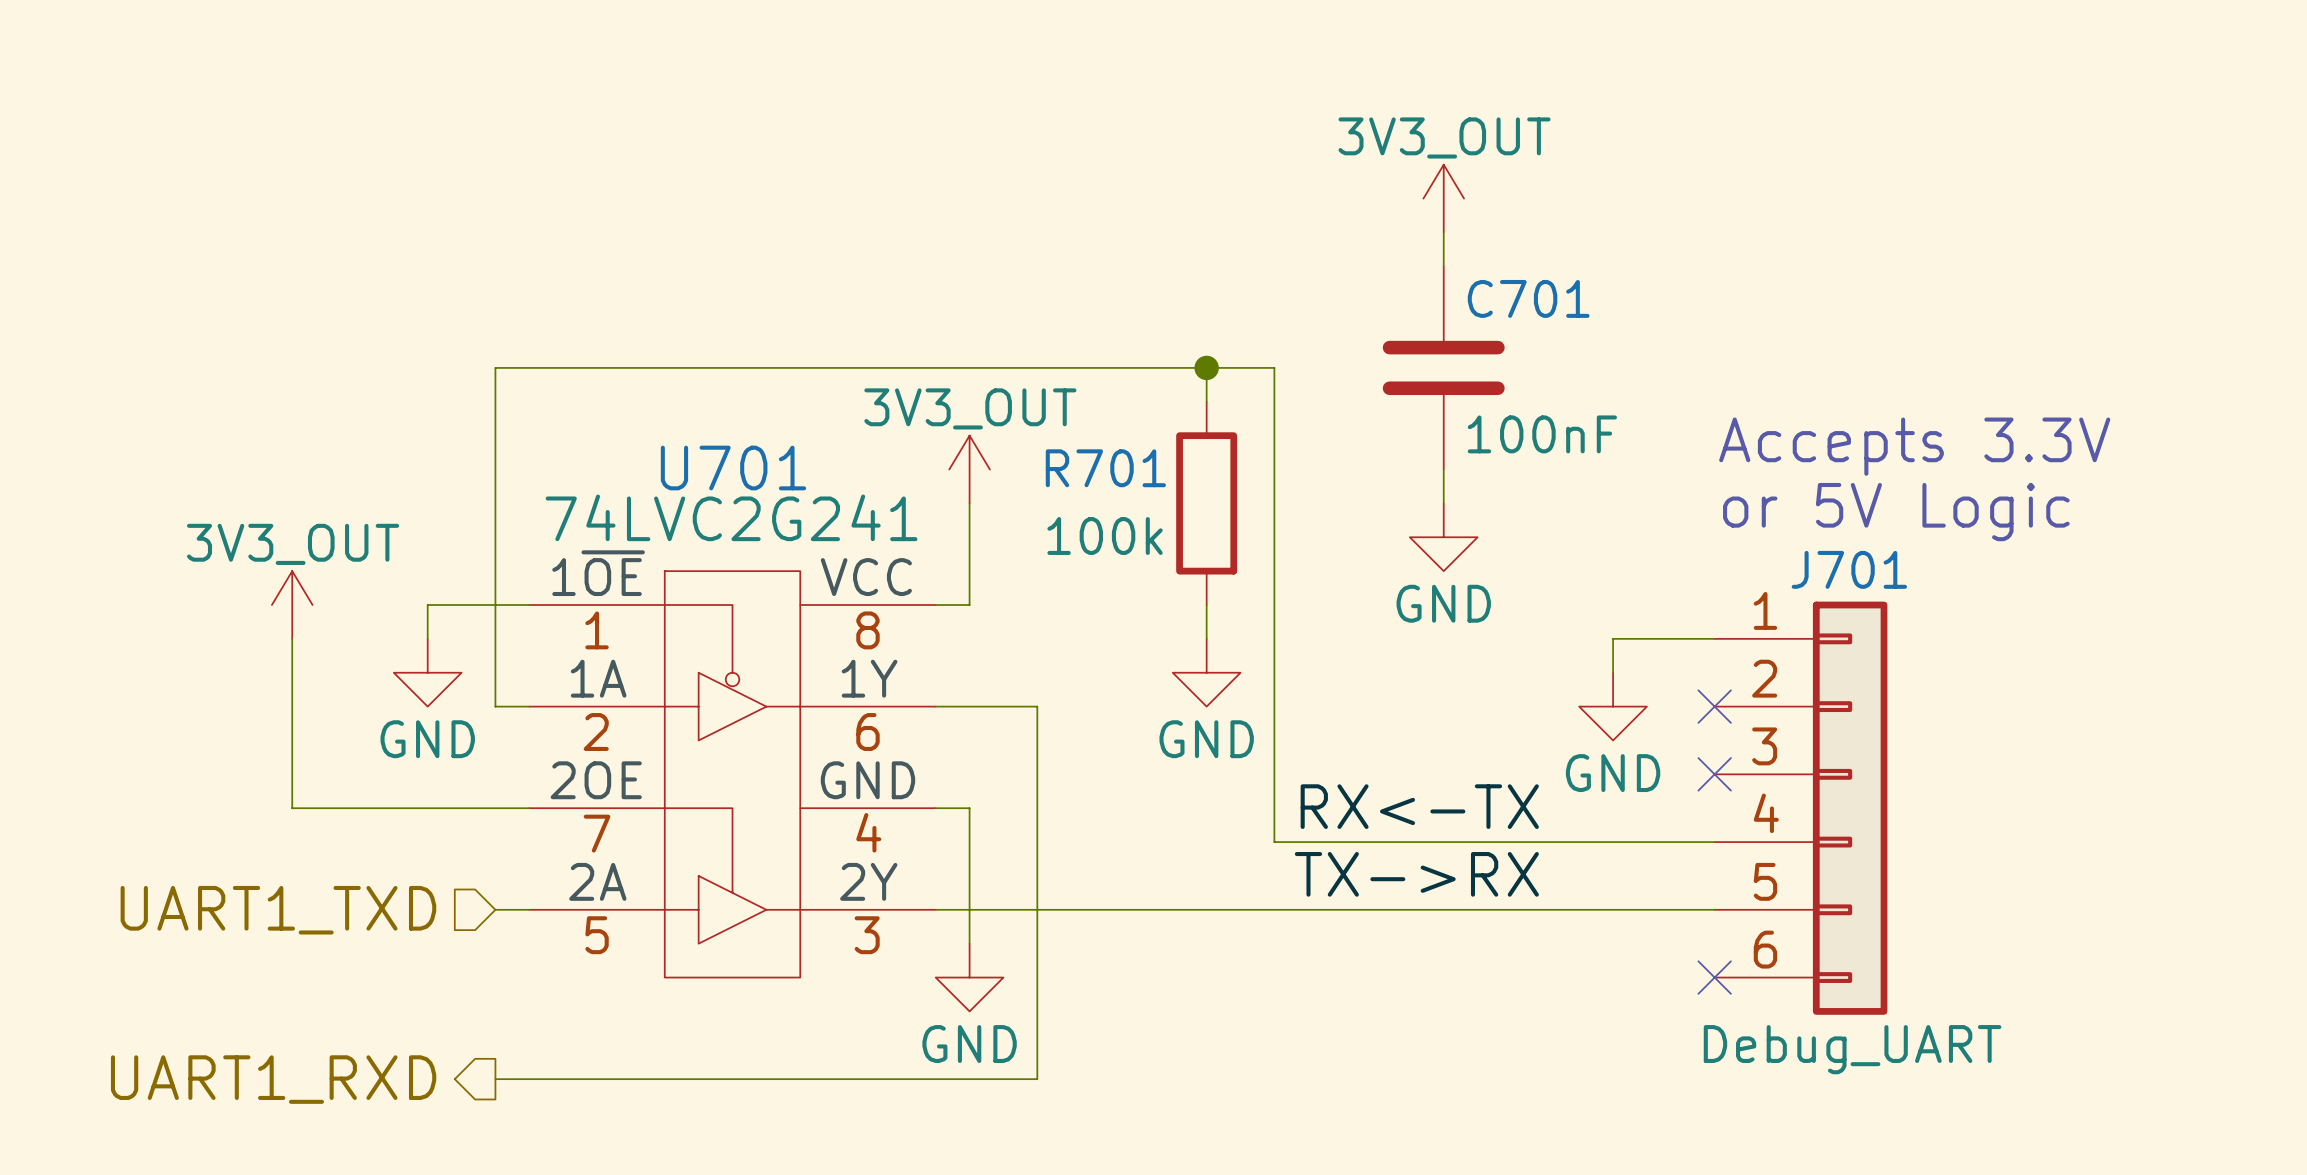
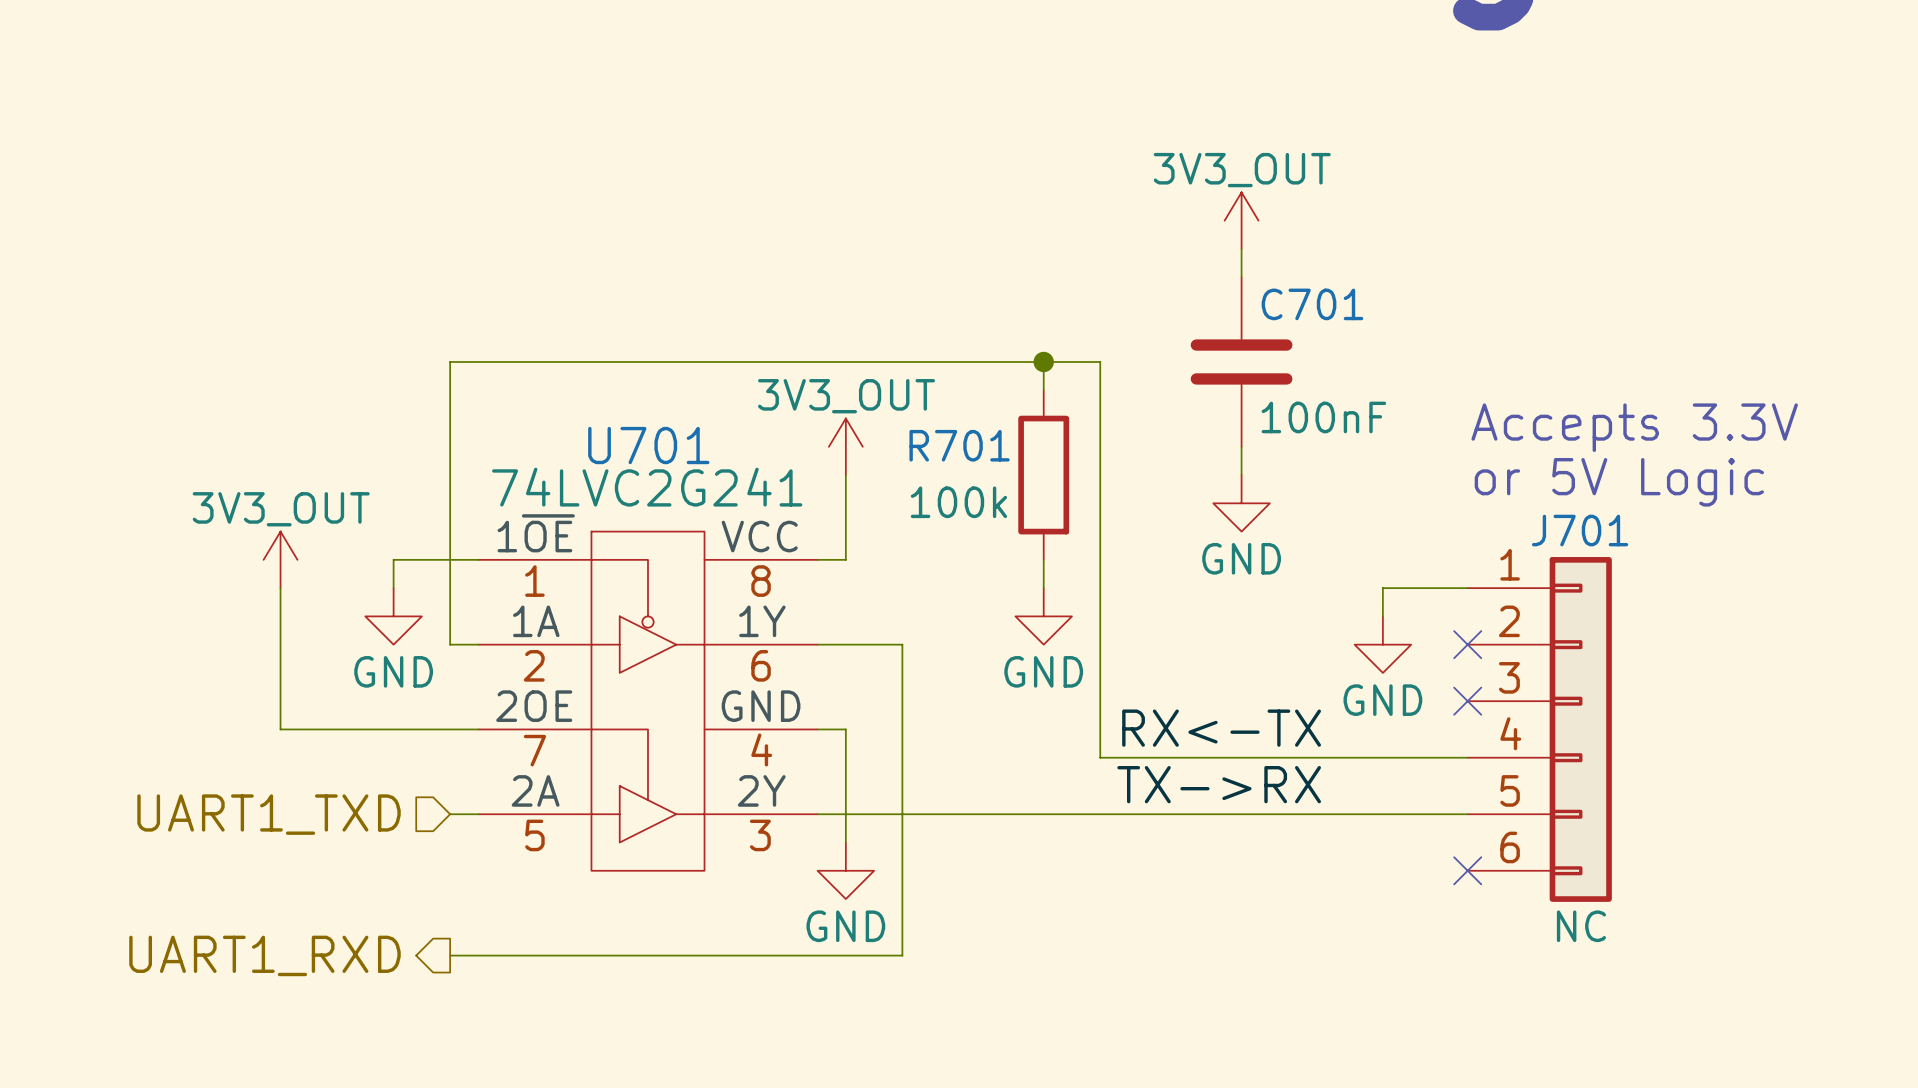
J701 value: Debug_UART (1852, 1049) -> NC (1581, 926)

